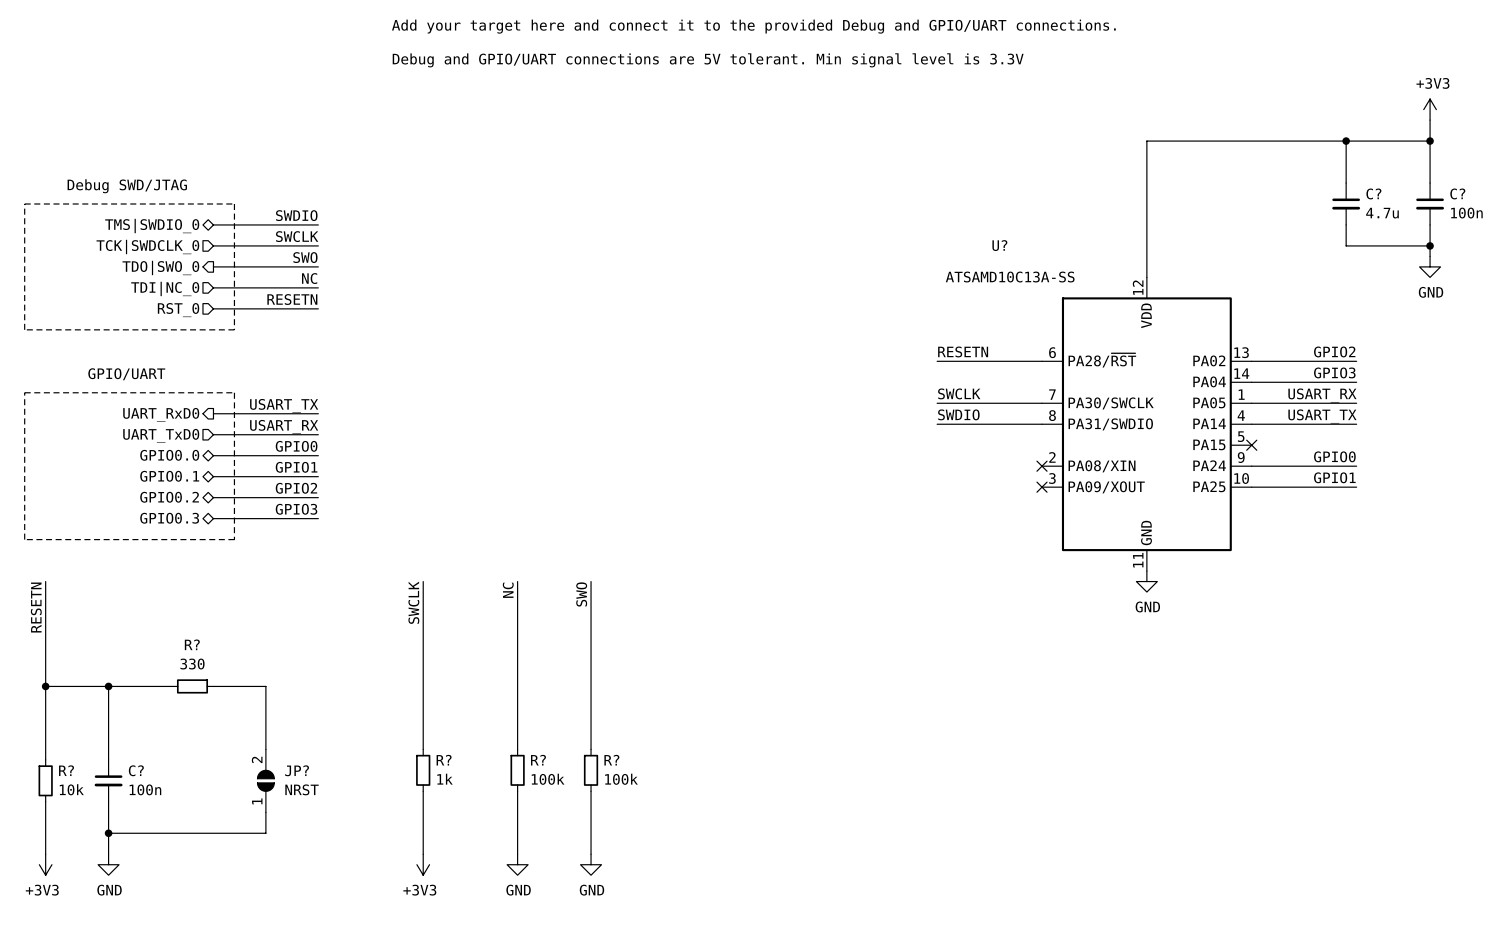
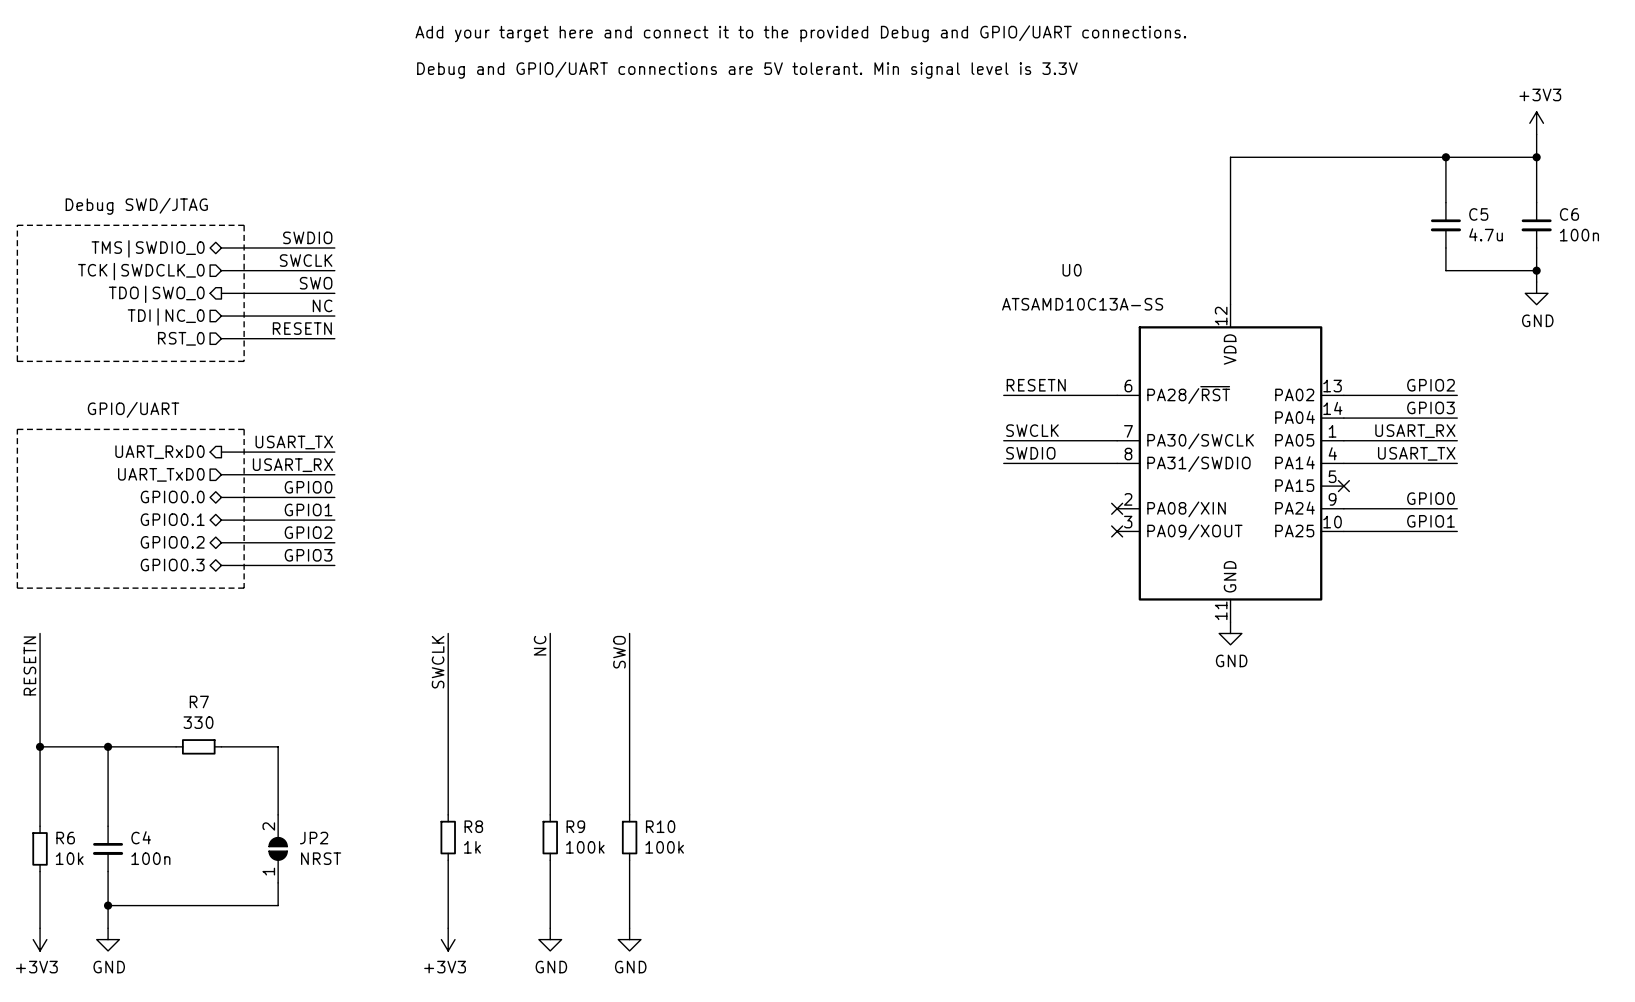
C? name: C? (1373, 193) -> C5 (1478, 214)
C? name: C? (1457, 193) -> C6 (1569, 214)
U? name: U? (999, 245) -> U0 (1072, 270)
R? name: R? (192, 644) -> R7 (199, 701)
R? name: R? (444, 760) -> R8 (473, 826)
R? name: R? (538, 760) -> R9 (575, 826)
R? name: R? (611, 760) -> R10 (660, 826)
R? name: R? (66, 770) -> R6 (65, 838)
C? name: C? (136, 770) -> C4 (141, 837)
JP? name: JP? (297, 770) -> JP2 (314, 838)

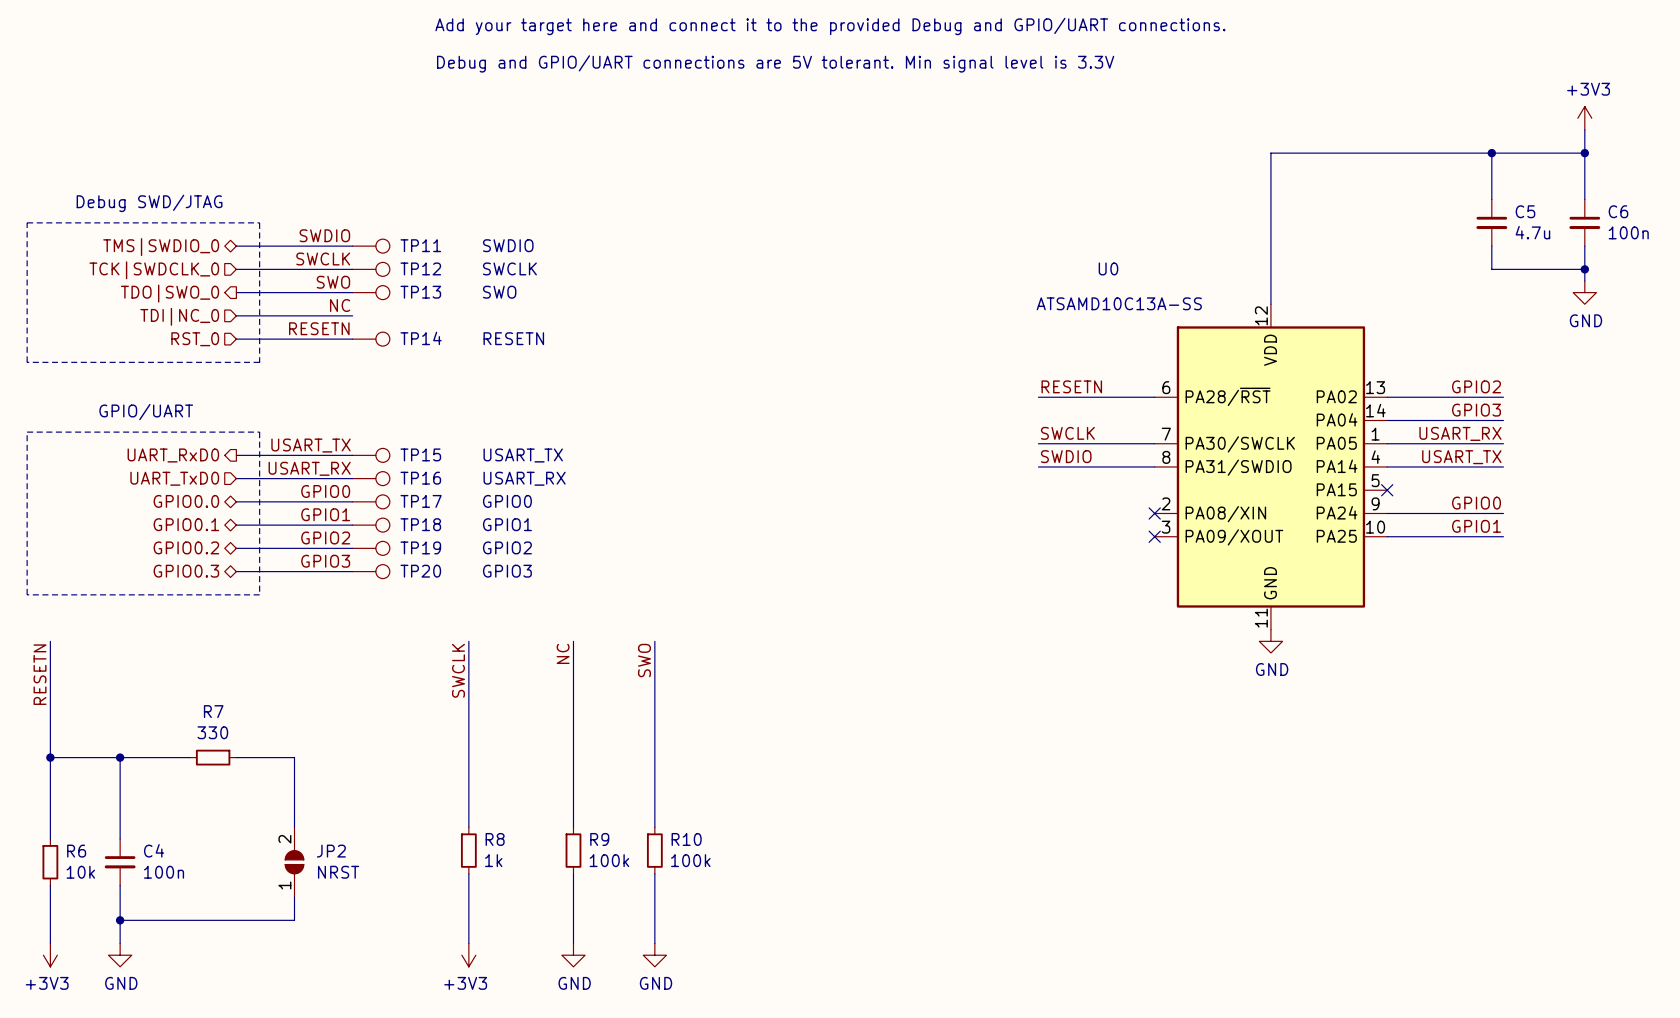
TP11: none -> SWDIO (371, 246)
TP12: none -> SWCLK (371, 269)
TP13: none -> SWO (371, 292)
TP14: none -> RESETN (371, 339)
TP15: none -> USART_TX (371, 455)
TP16: none -> USART_RX (371, 478)
TP17: none -> GPIO0 (371, 501)
TP18: none -> GPIO1 (371, 525)
TP19: none -> GPIO2 (371, 548)
TP20: none -> GPIO3 (371, 571)

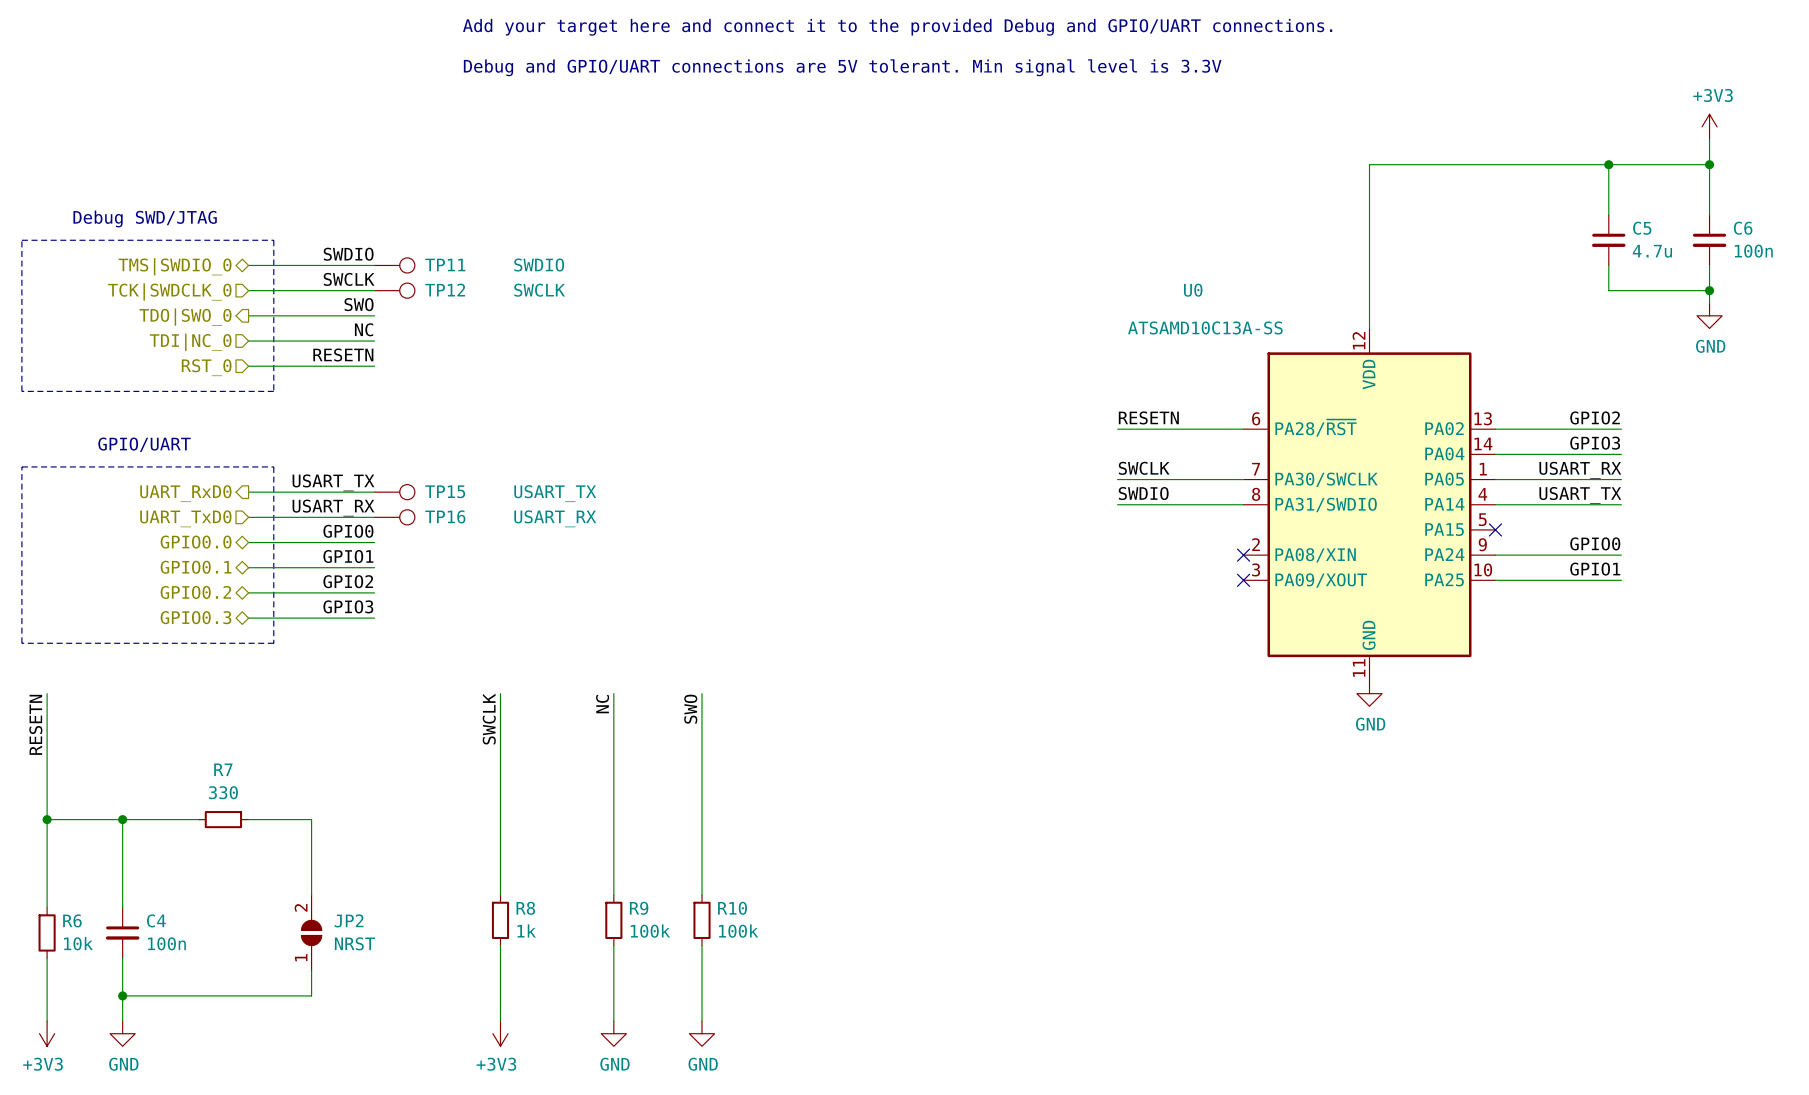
TP13: SWO (371, 292) -> none
TP14: RESETN (371, 339) -> none
TP17: GPIO0 (371, 501) -> none
TP18: GPIO1 (371, 525) -> none
TP19: GPIO2 (371, 548) -> none
TP20: GPIO3 (371, 571) -> none

